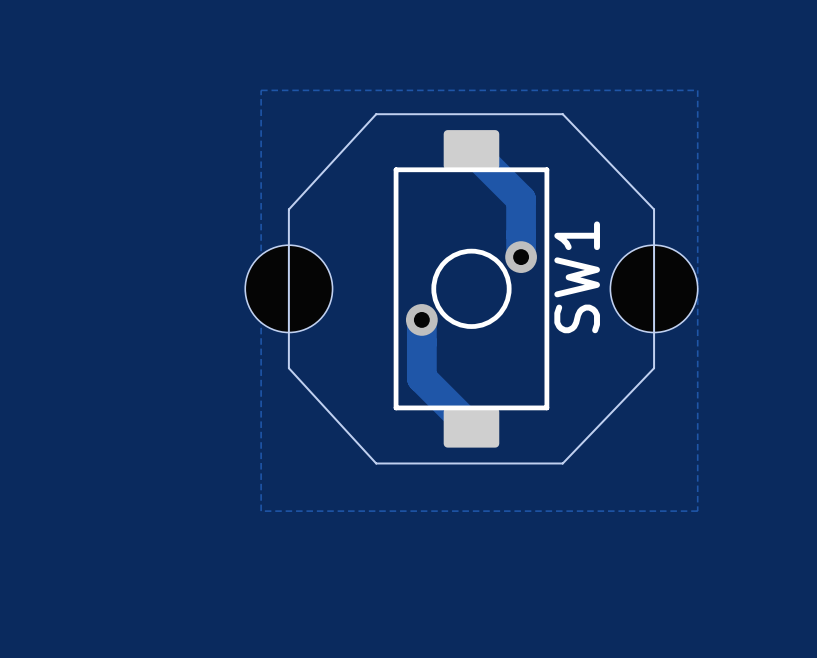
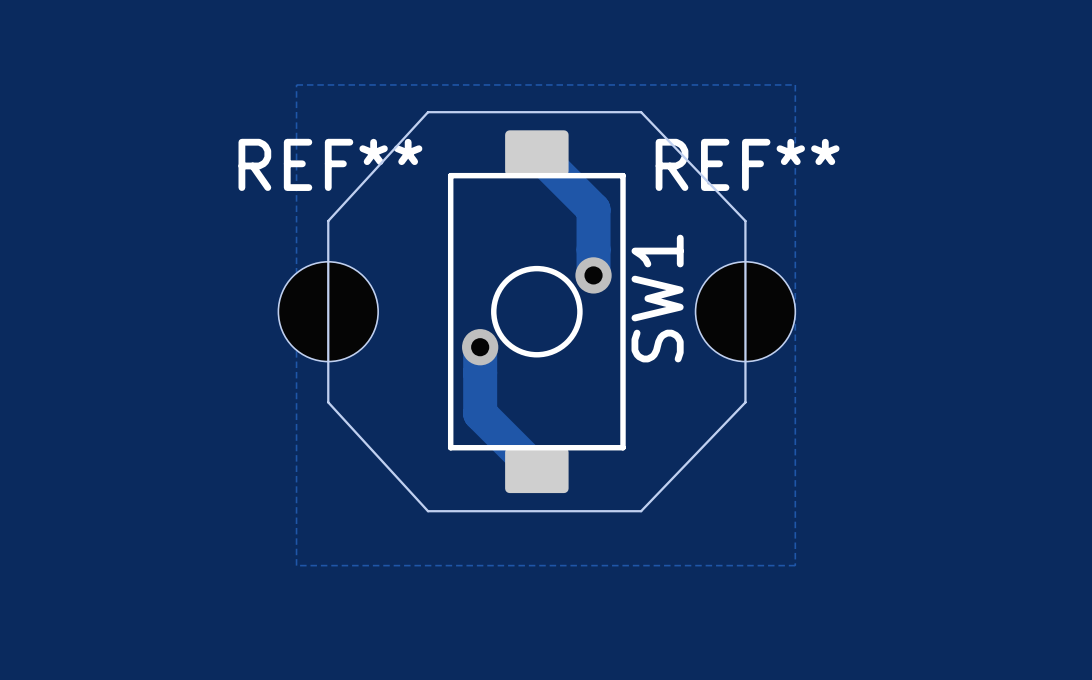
REF** name: none -> REF** (330, 164)
REF** name: none -> REF** (747, 164)

